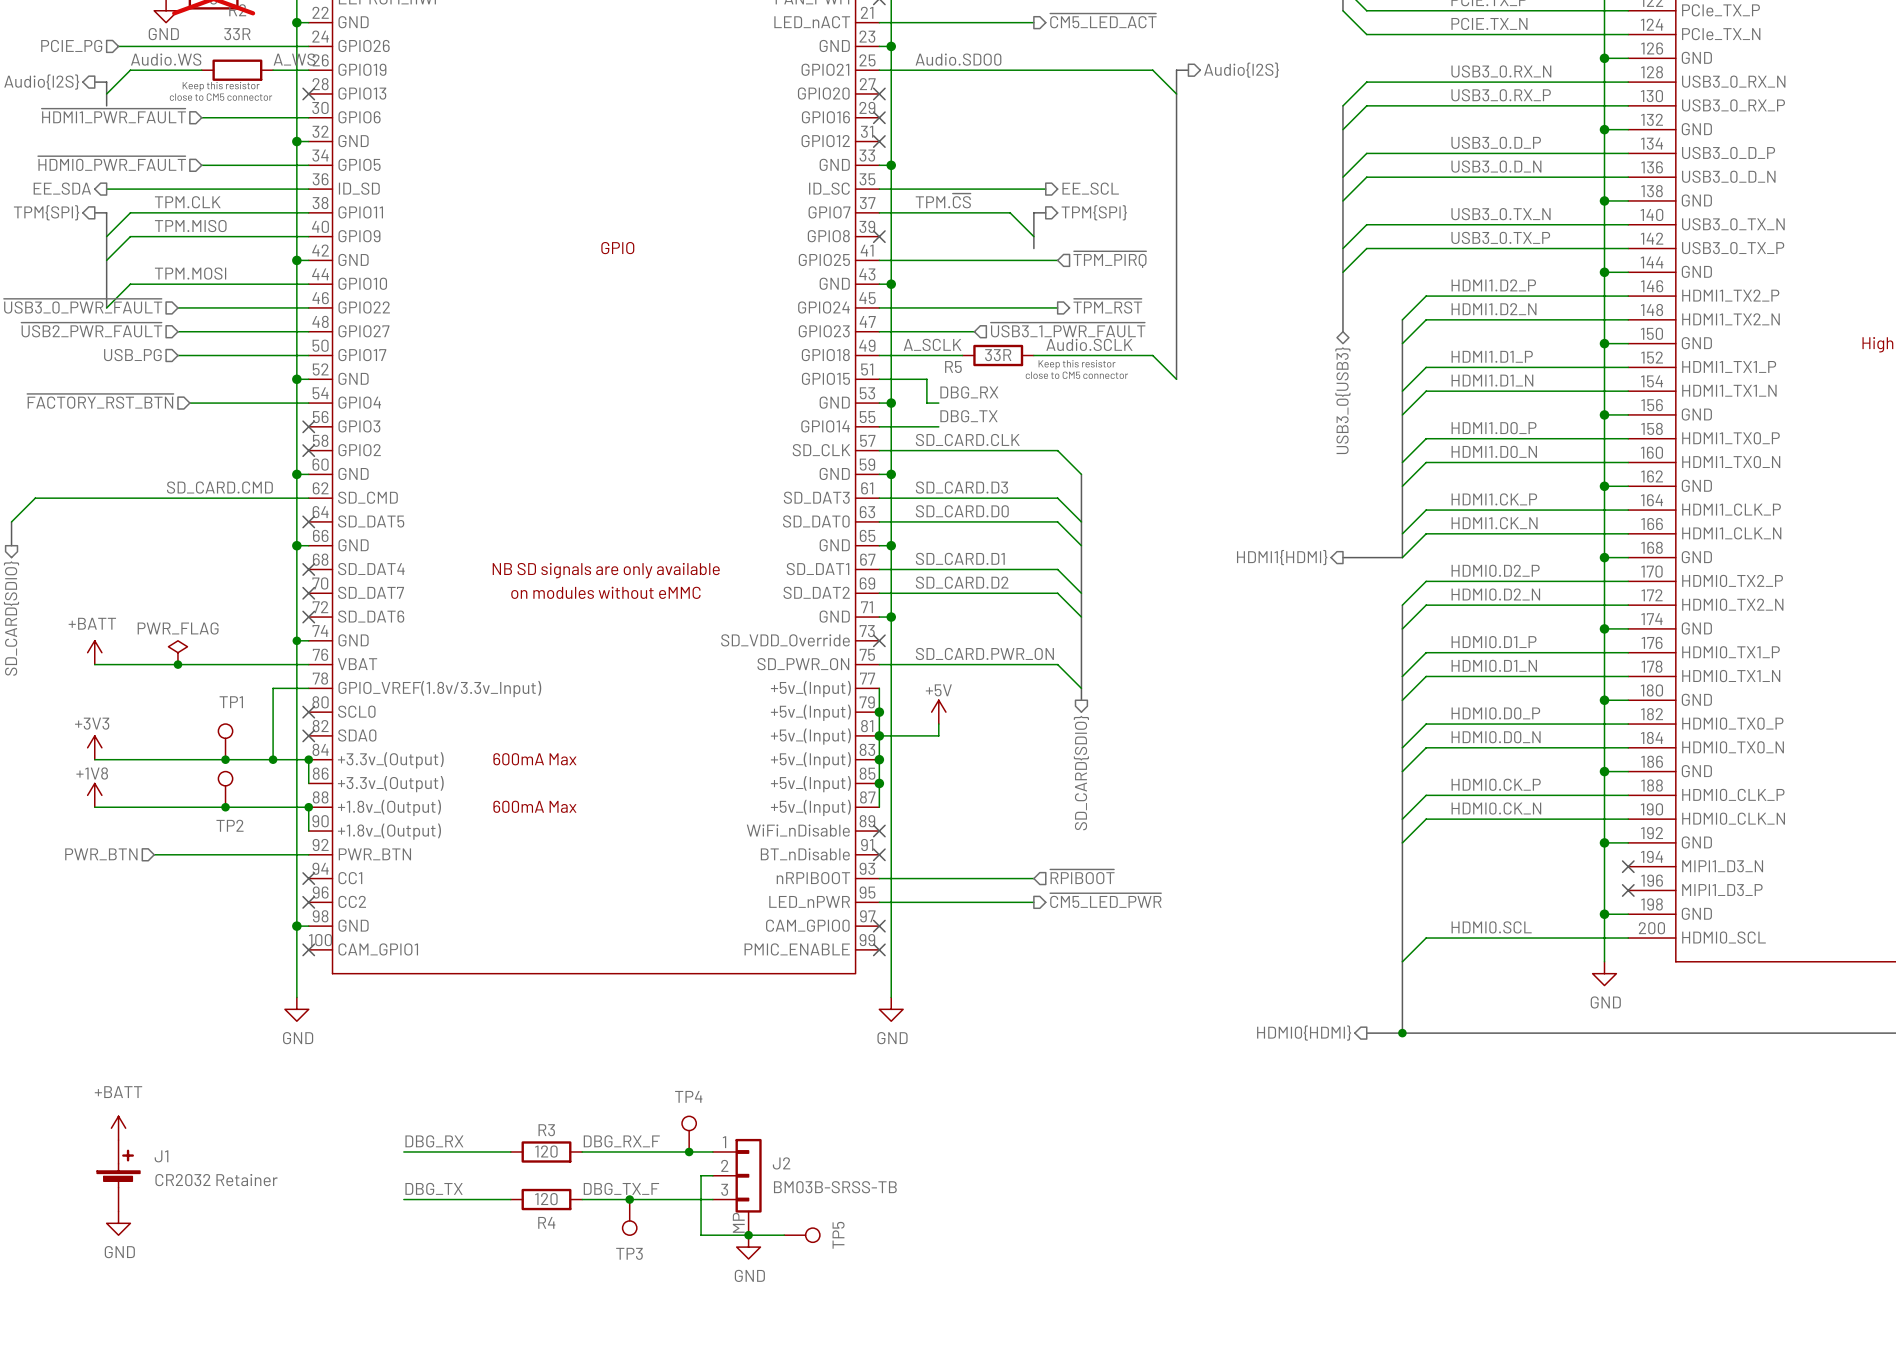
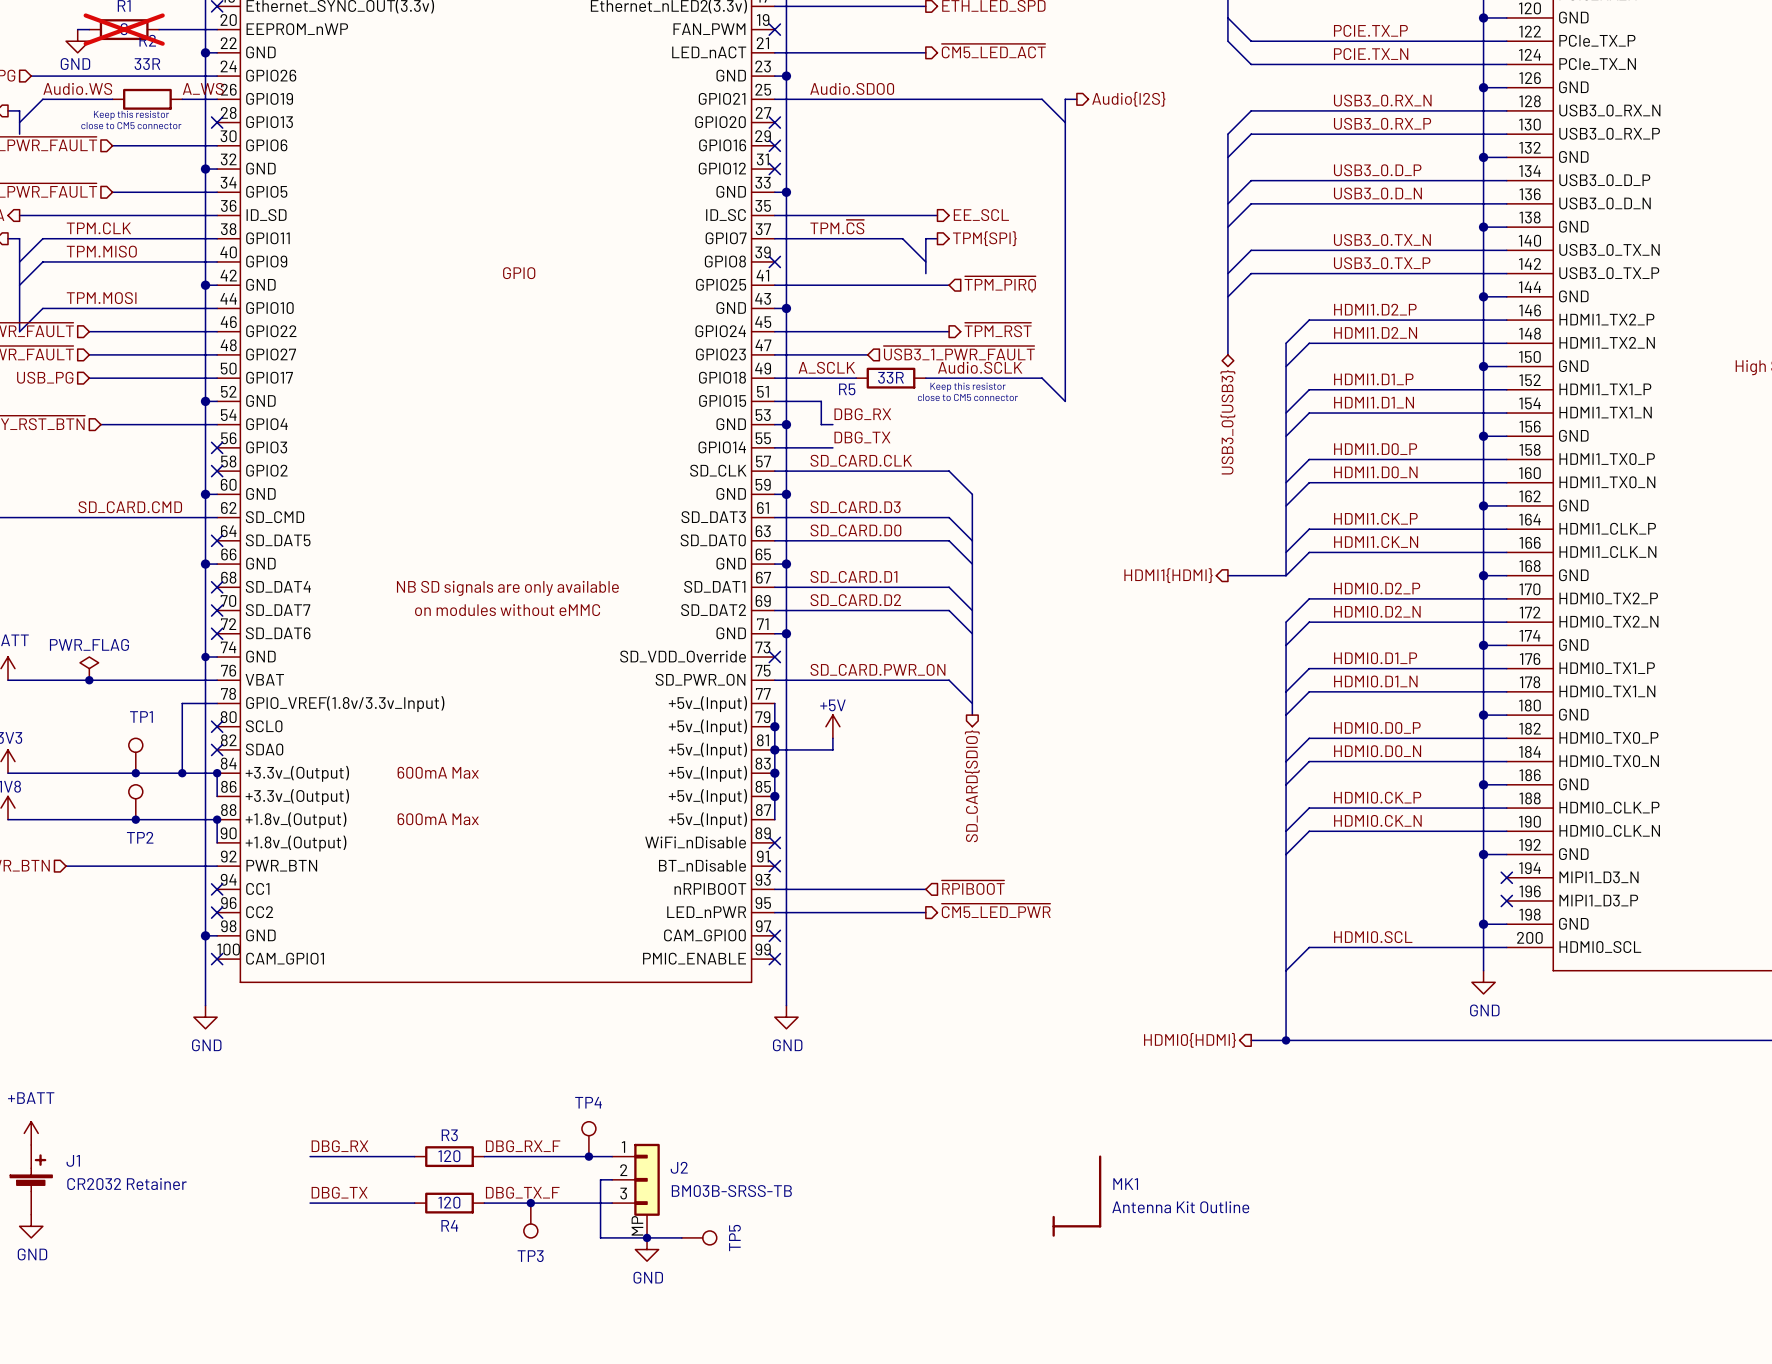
MK1: none -> Antenna Kit Outline (1076, 1196)

